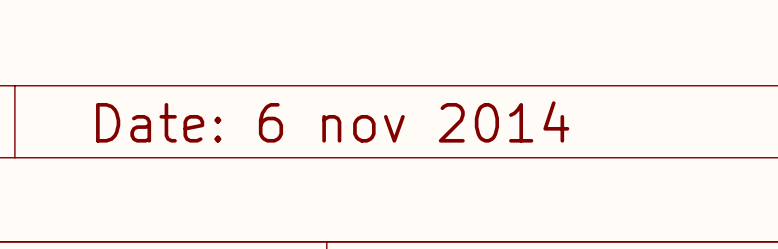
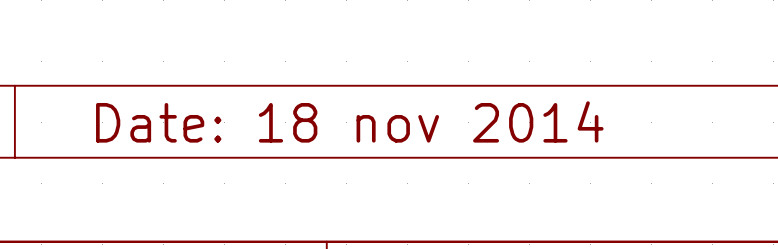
title block: Date: 6 nov 2014 (332, 121) -> Date: 18 nov 2014 (349, 121)

